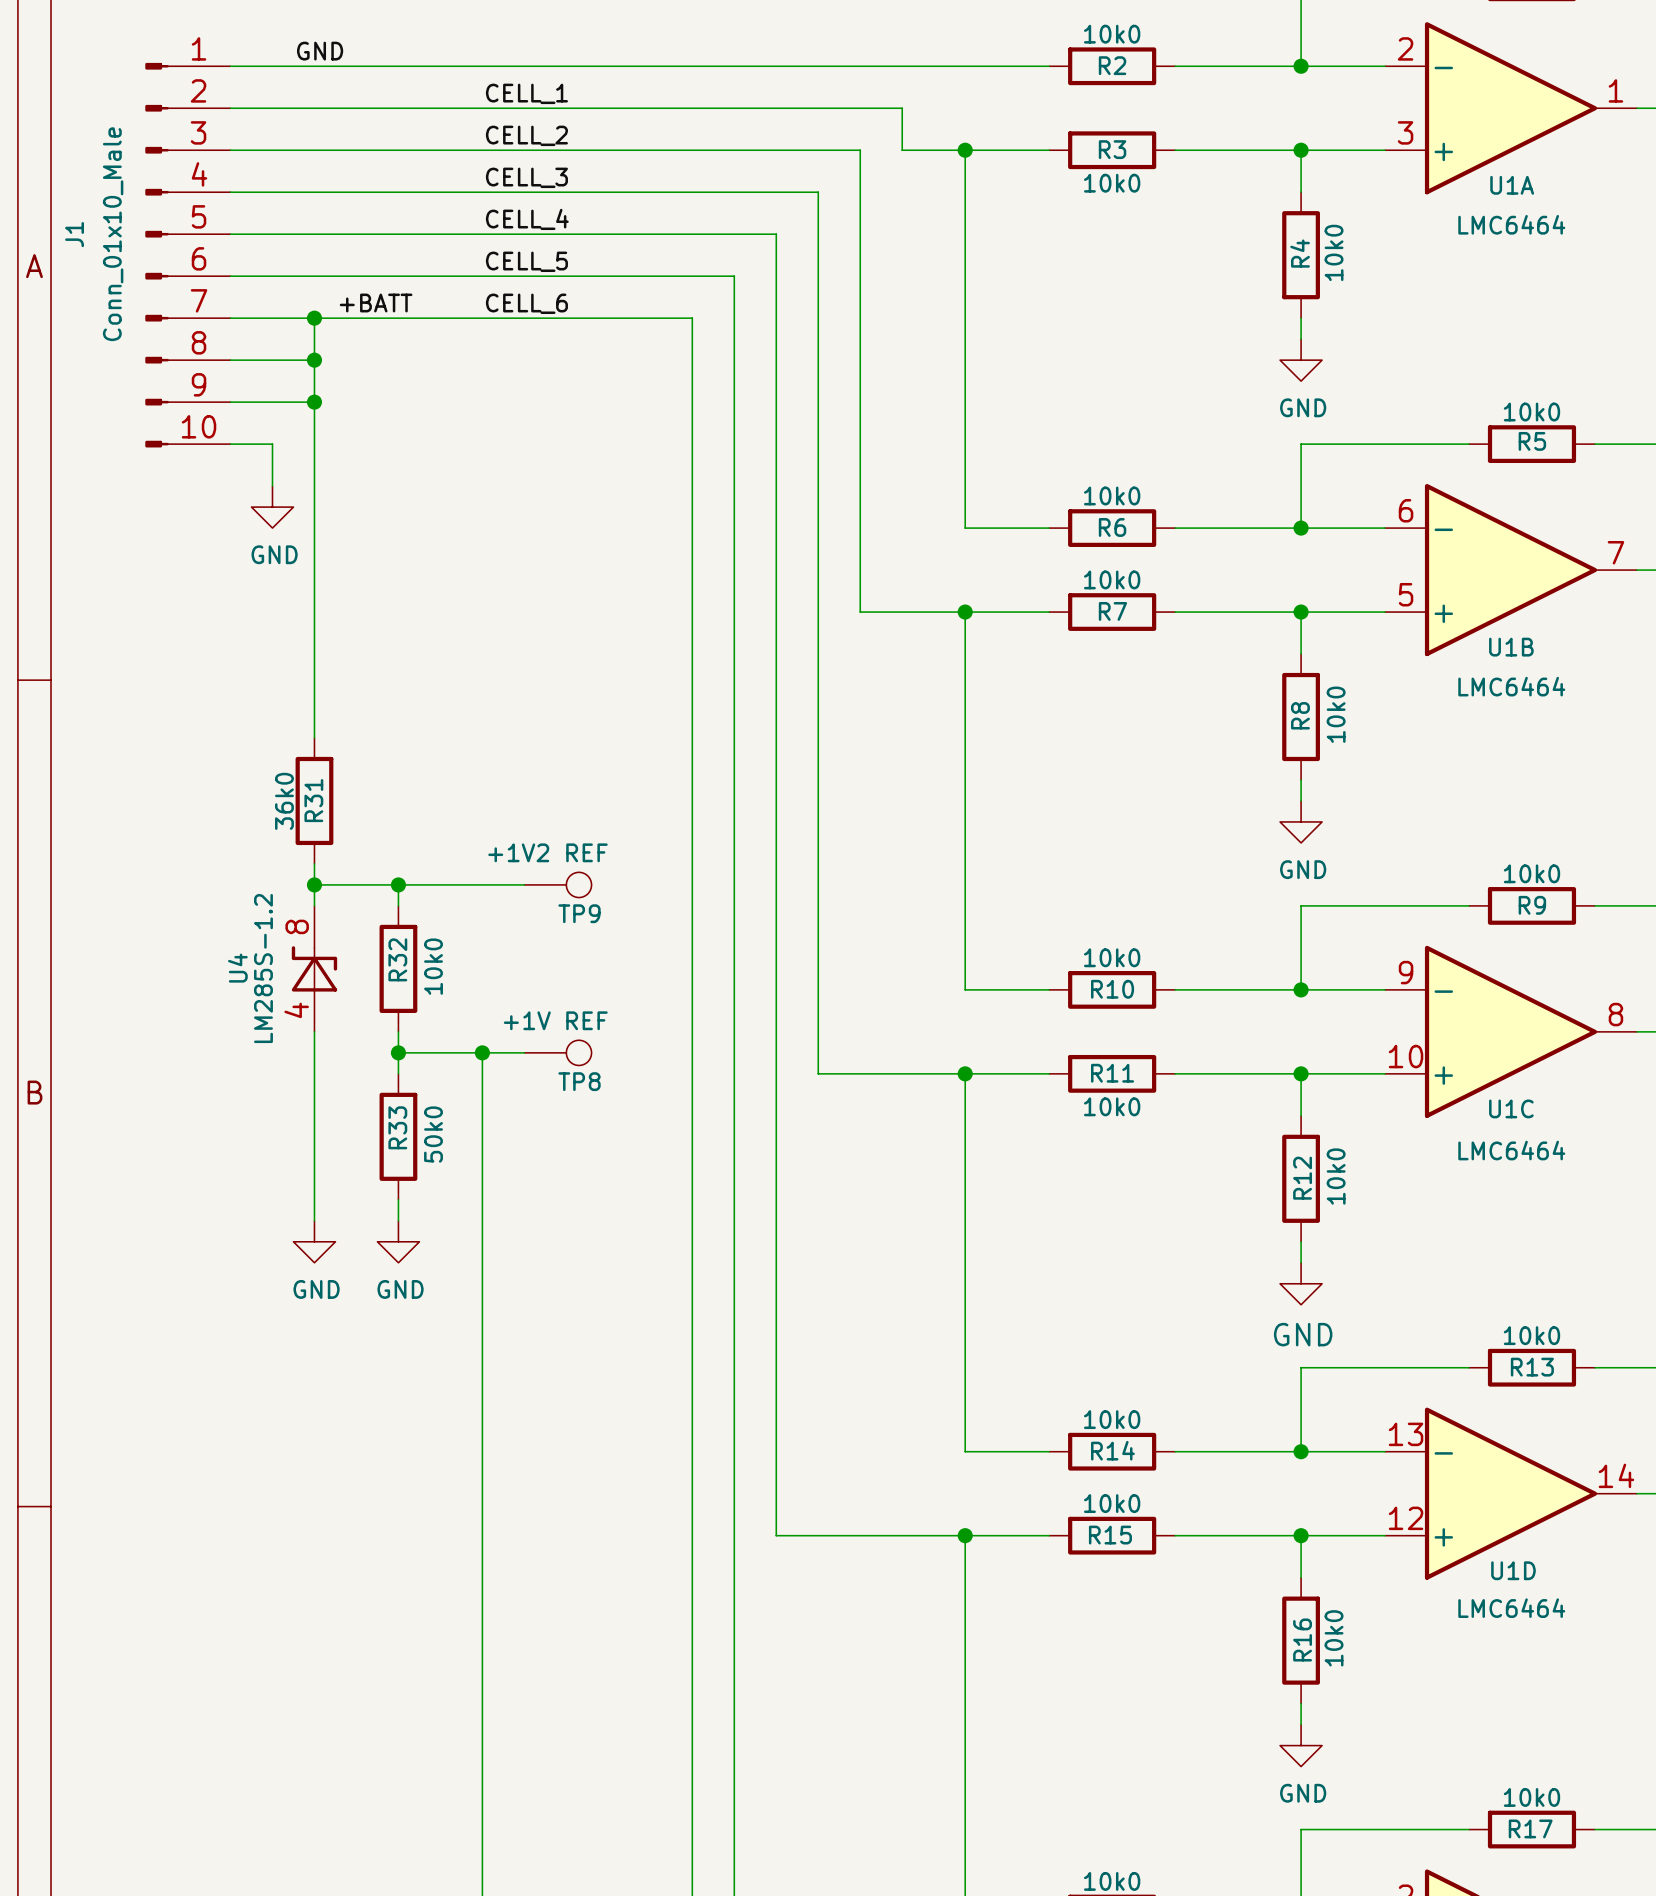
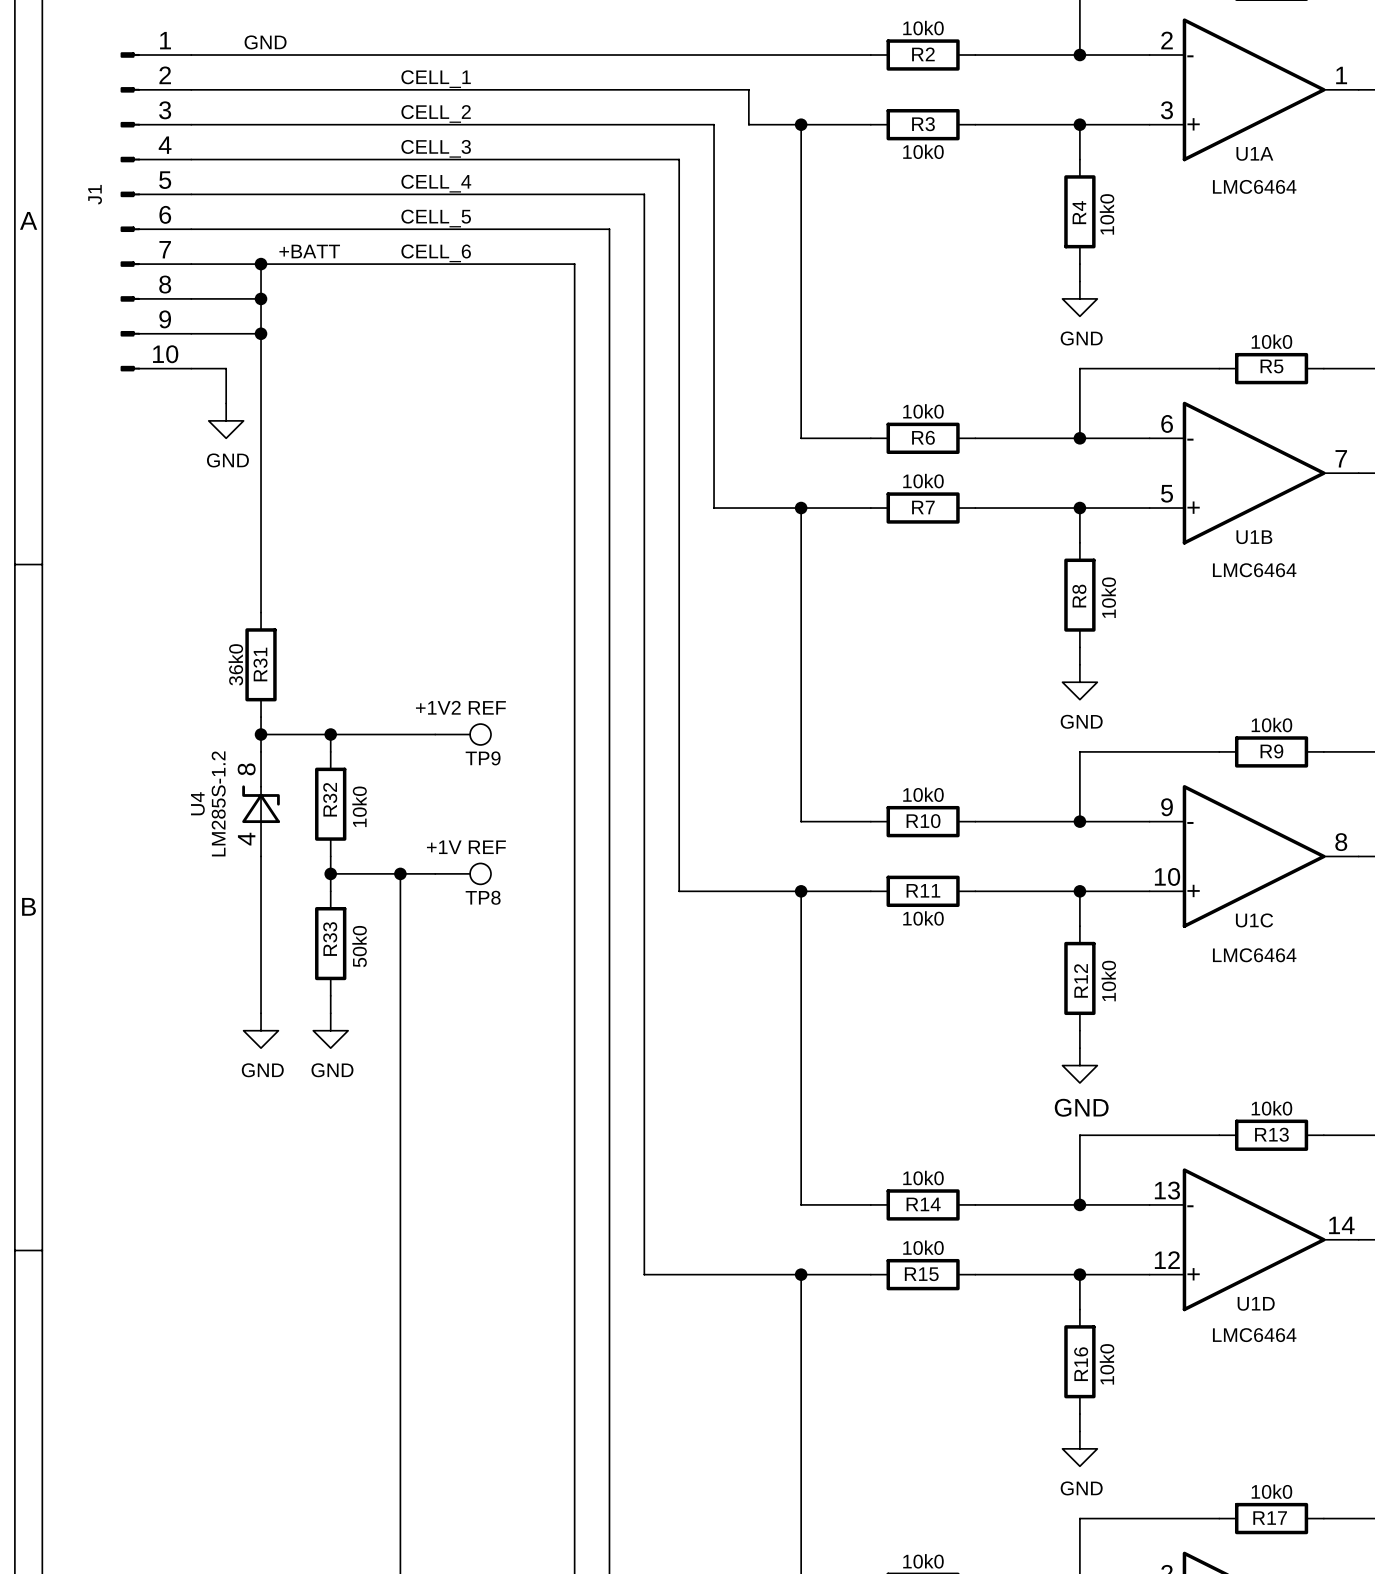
J1 name position: J1 (74, 234) -> J1 (95, 194)
J1 value: Conn_01x10_Male (113, 234) -> none

